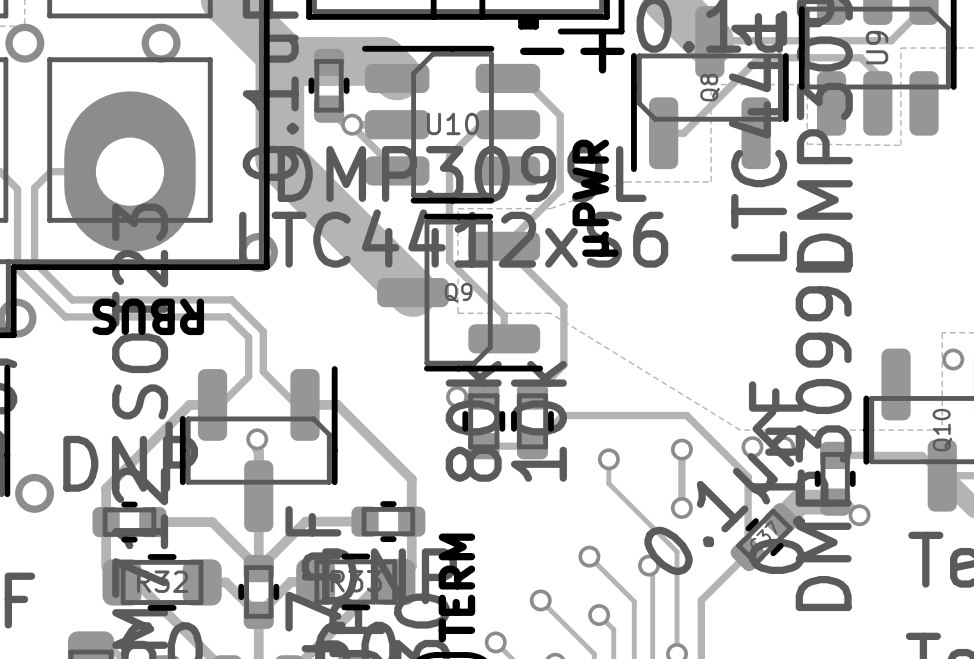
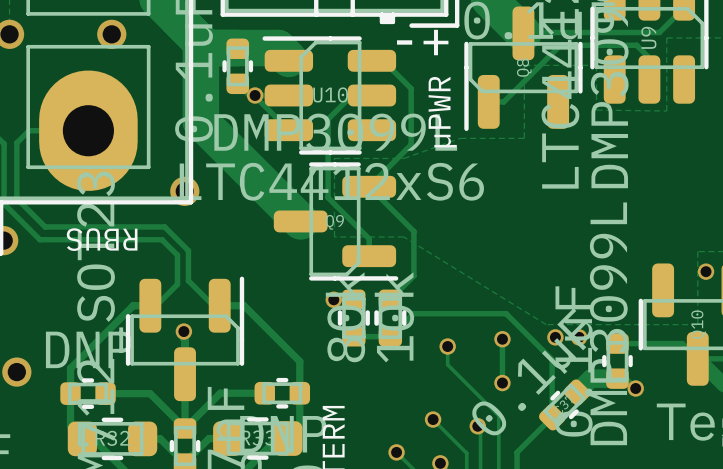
text position: µPWR (595, 198) -> µPWR (442, 112)

